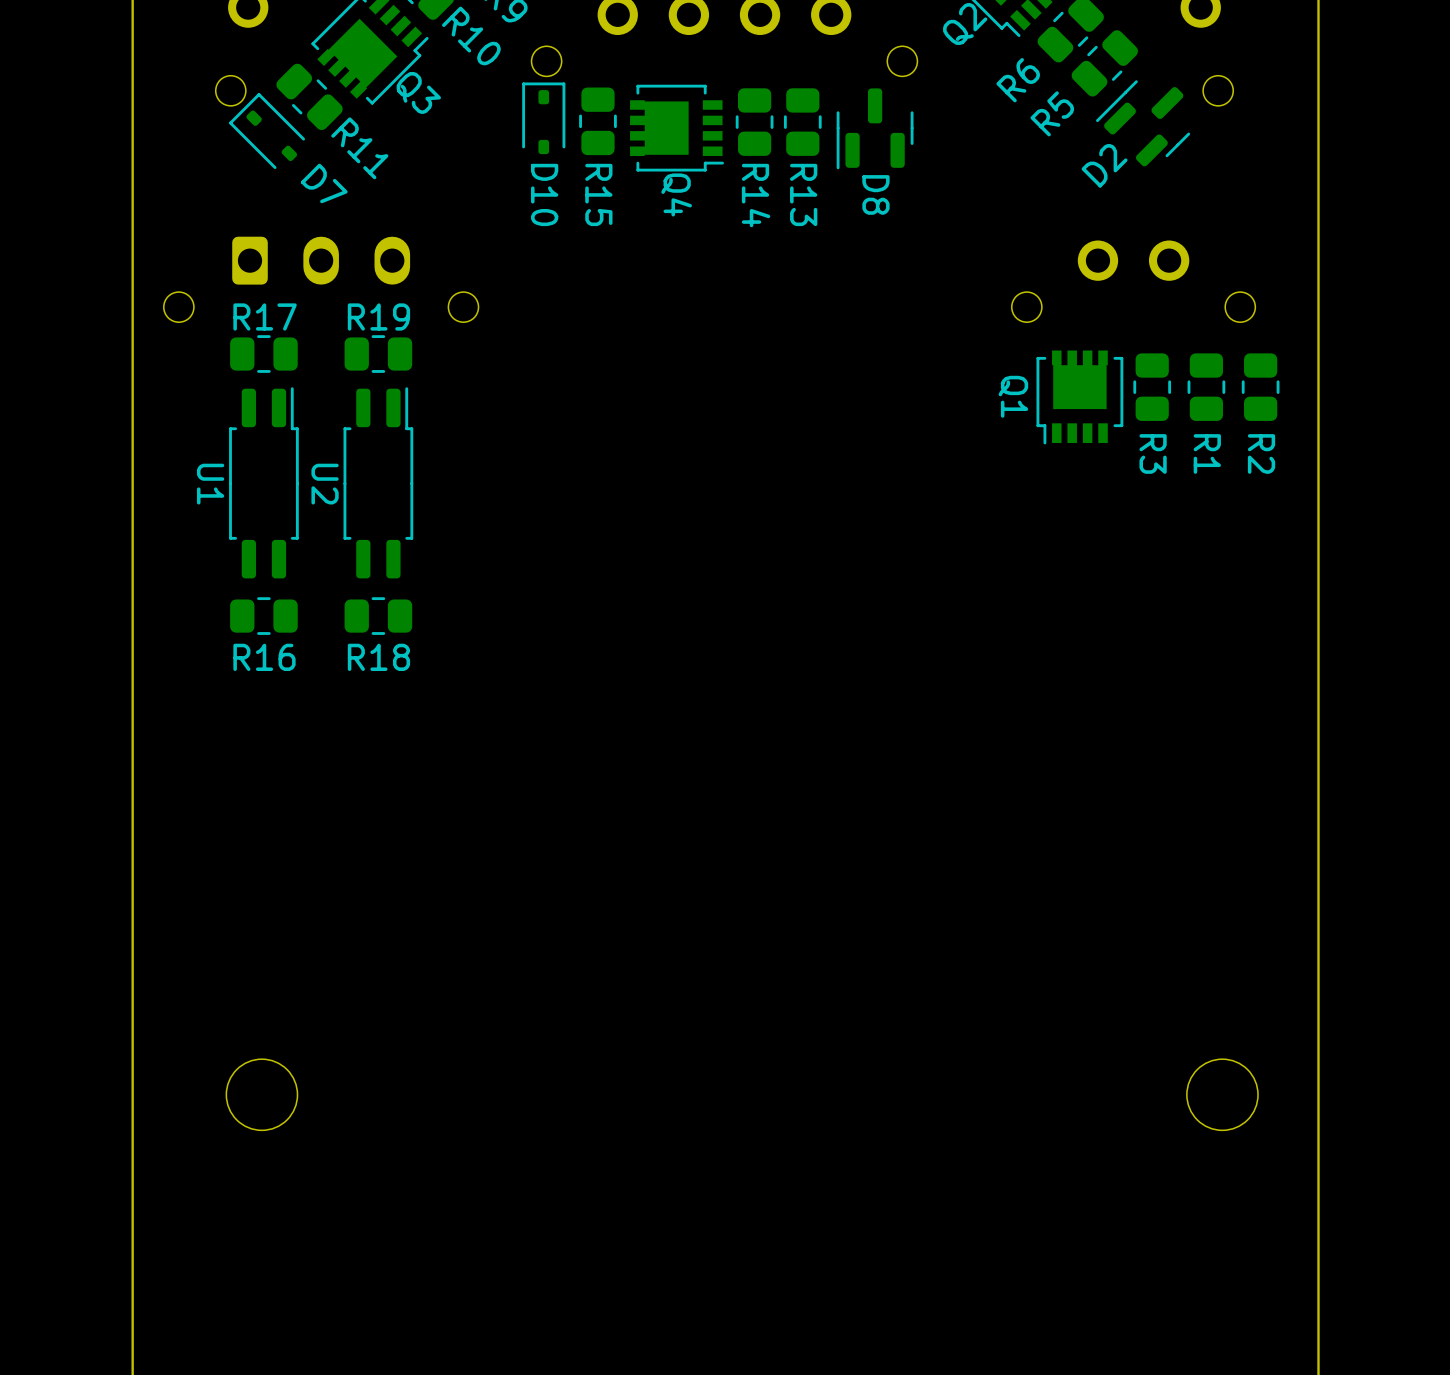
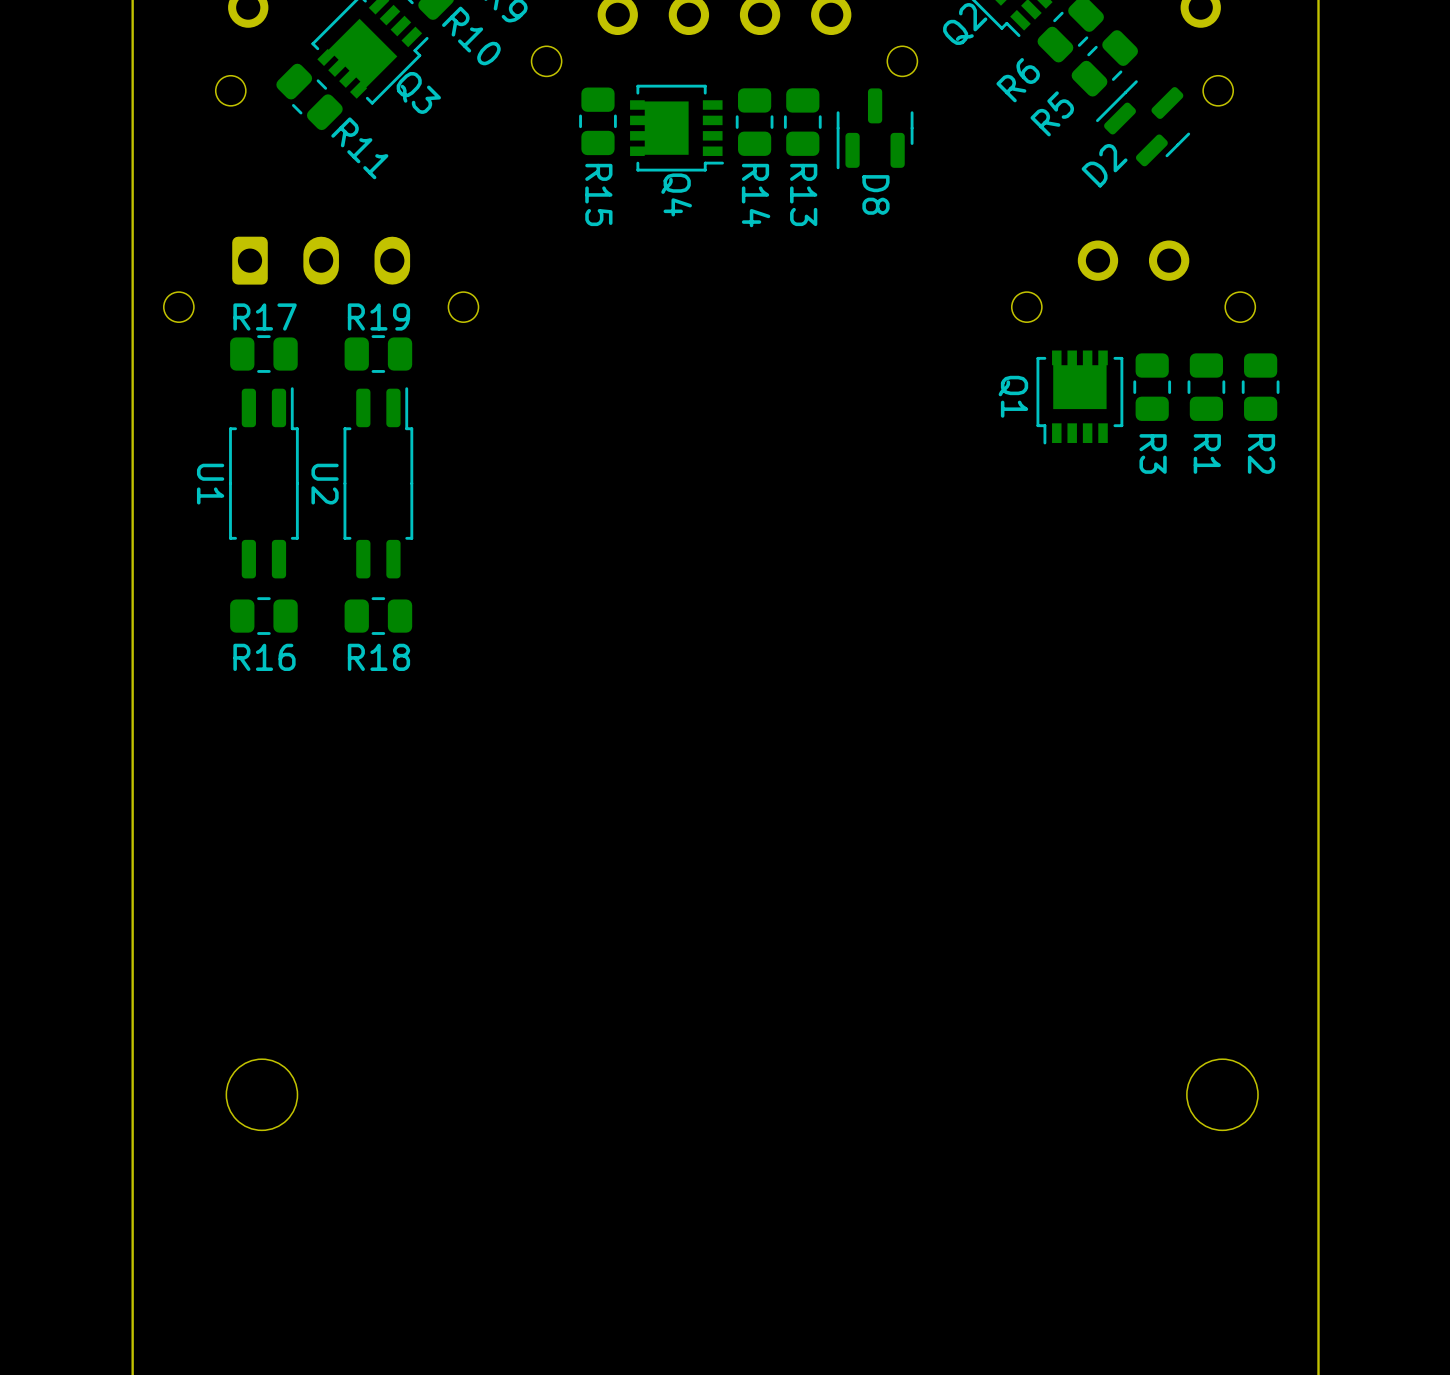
D10: (543, 118) -> none
D7: (267, 131) -> none

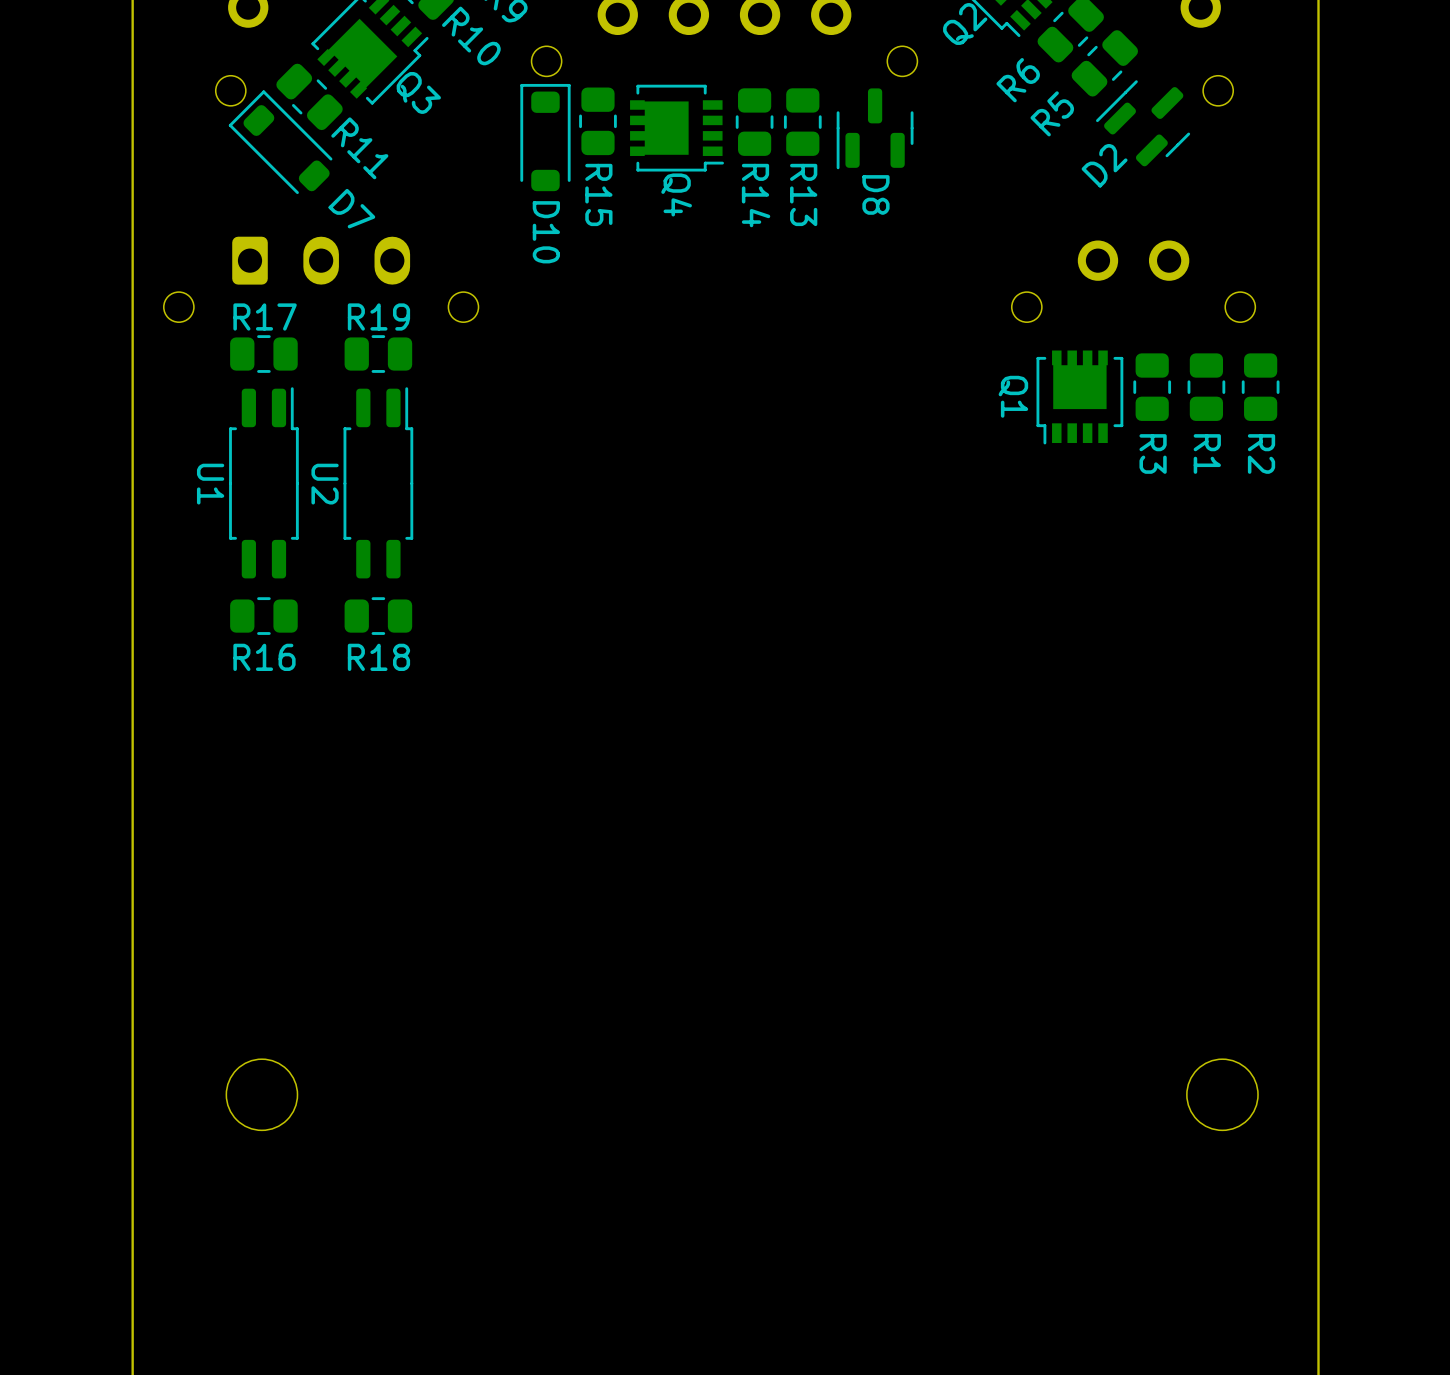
D10: none -> (545, 137)
D7: none -> (280, 142)

